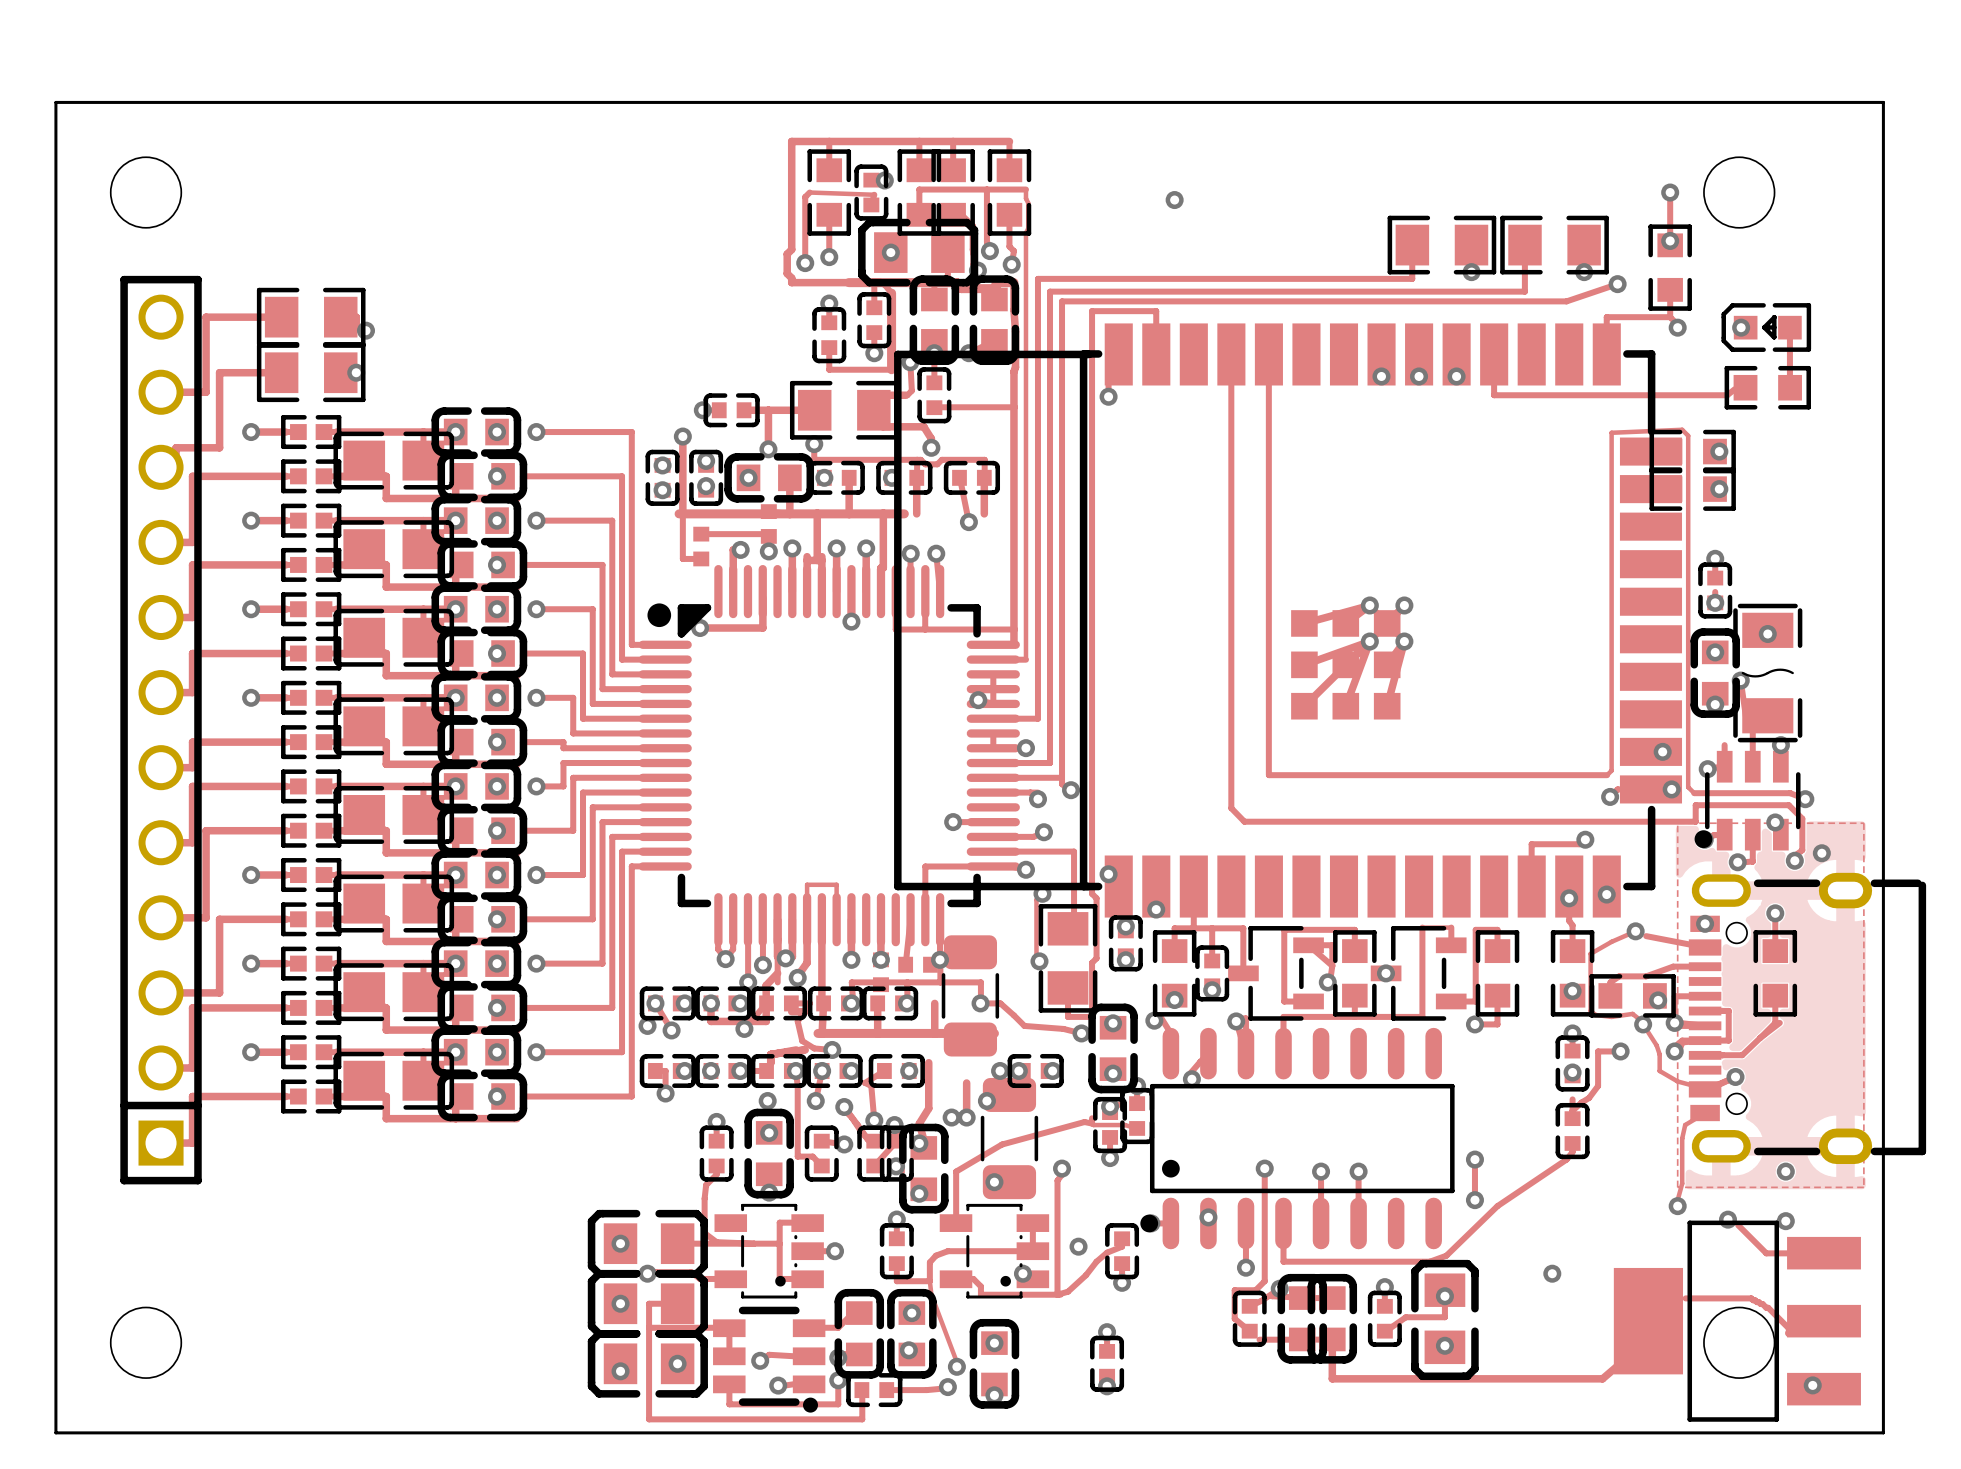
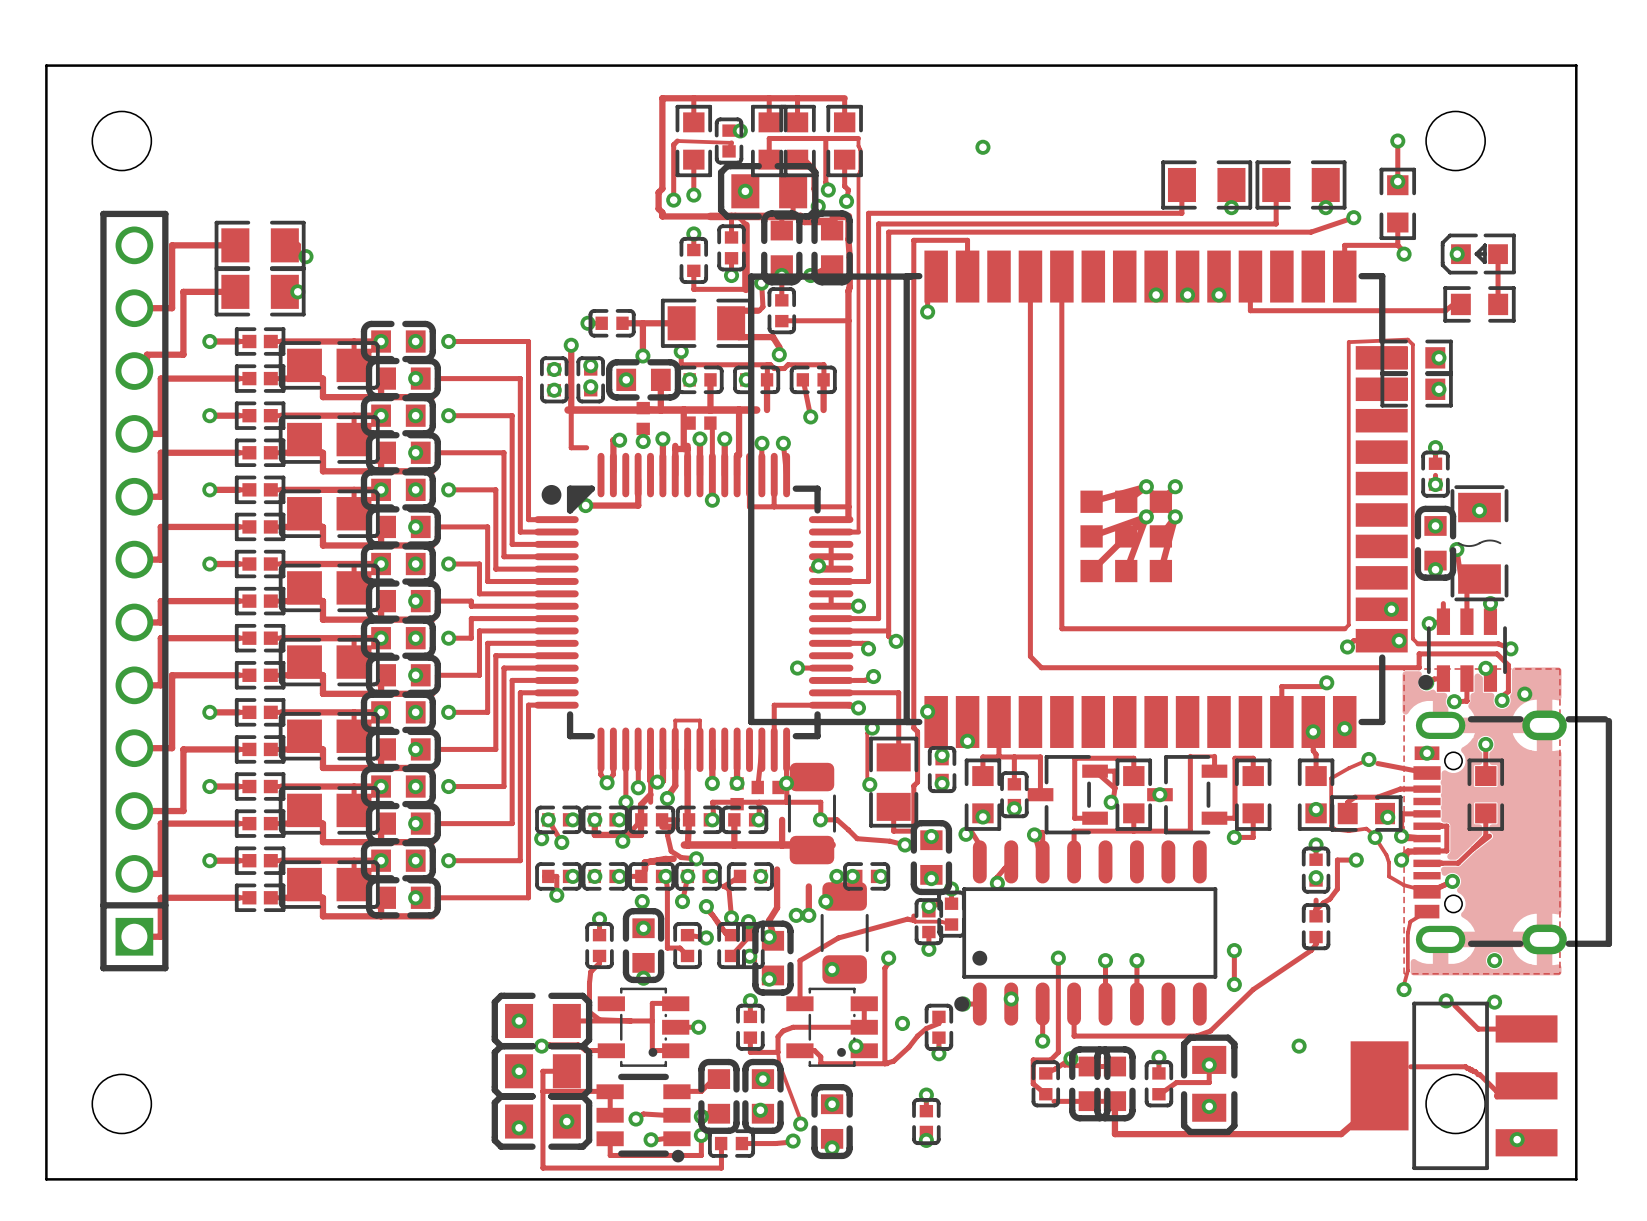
track: none -> (710, 423) (712, 423) (712, 475)
track: (701, 534) (768, 534) -> none
part rotation: 0° (701, 546) -> 90° clockwise (699, 423)
part position: (701, 546) -> (699, 423)

